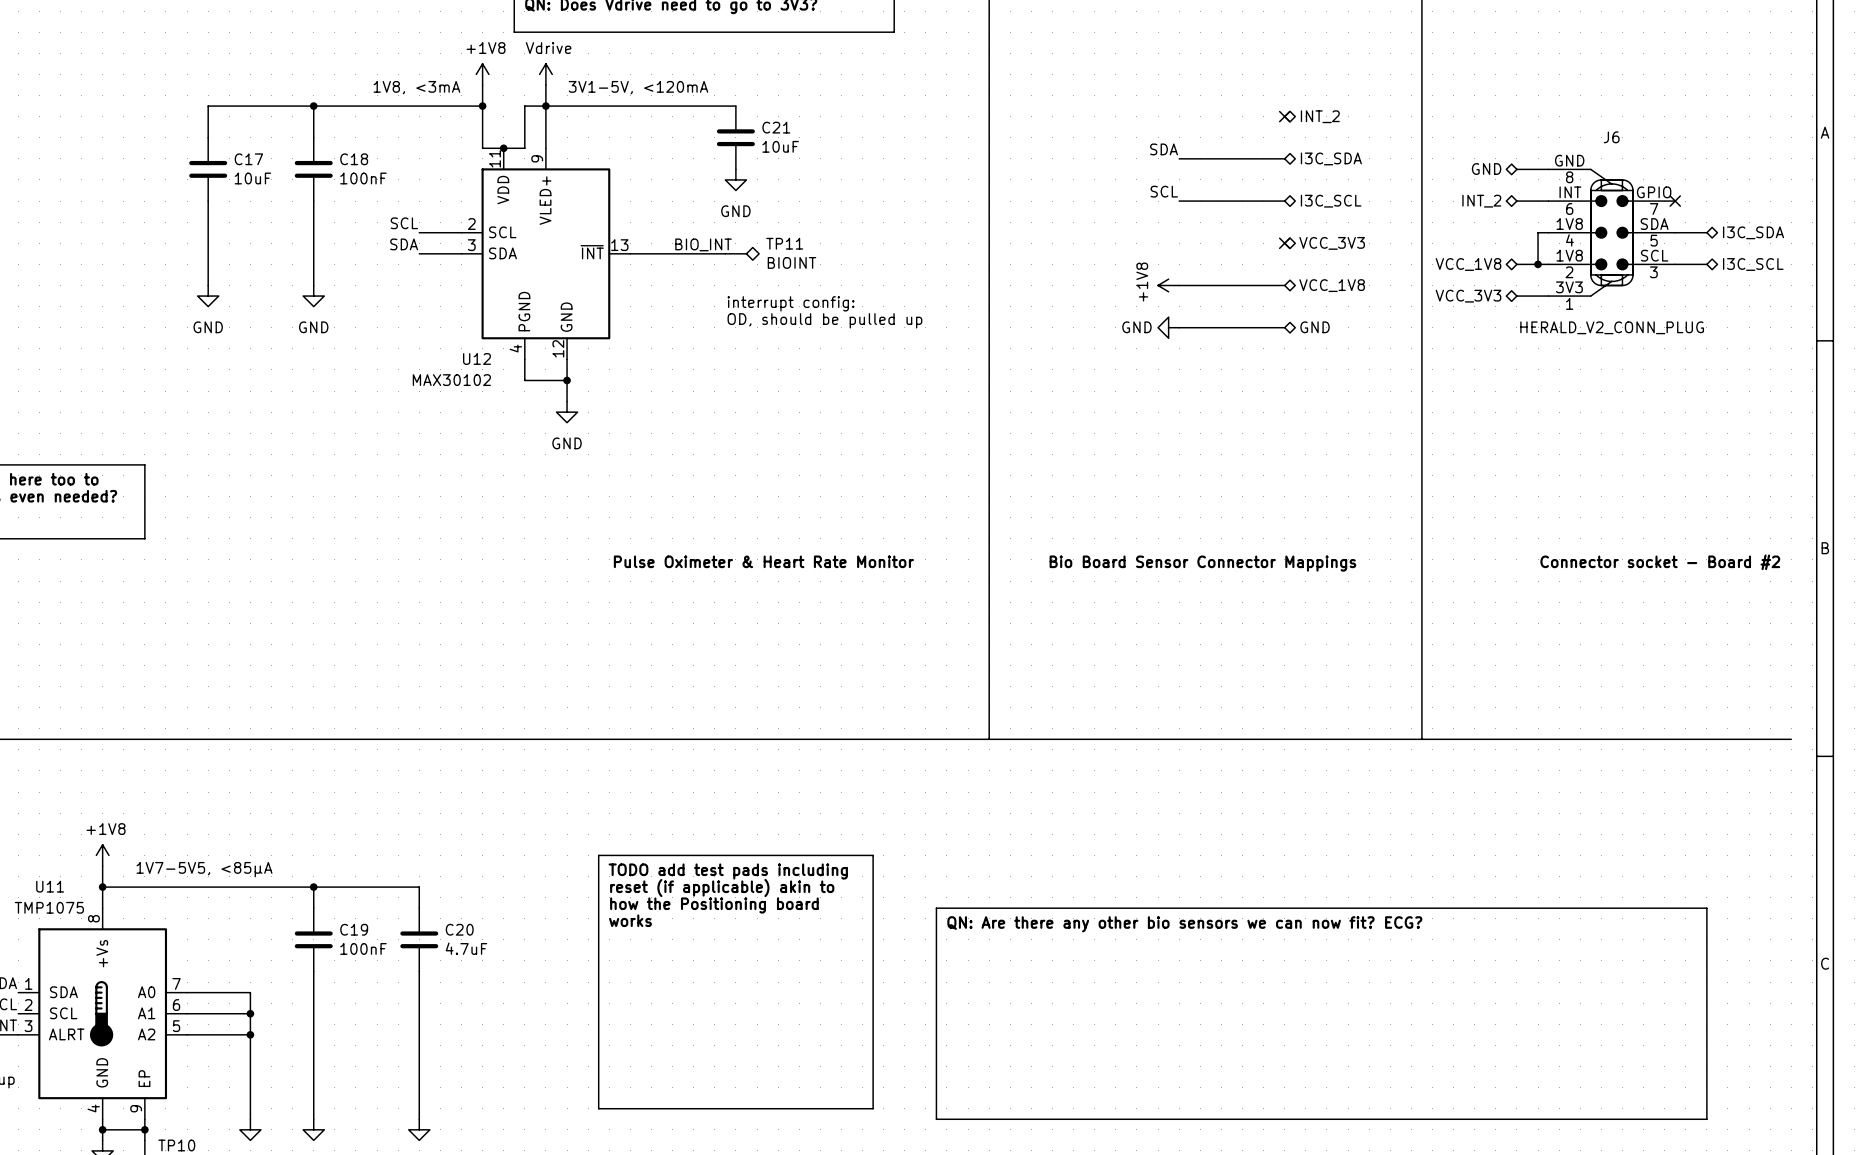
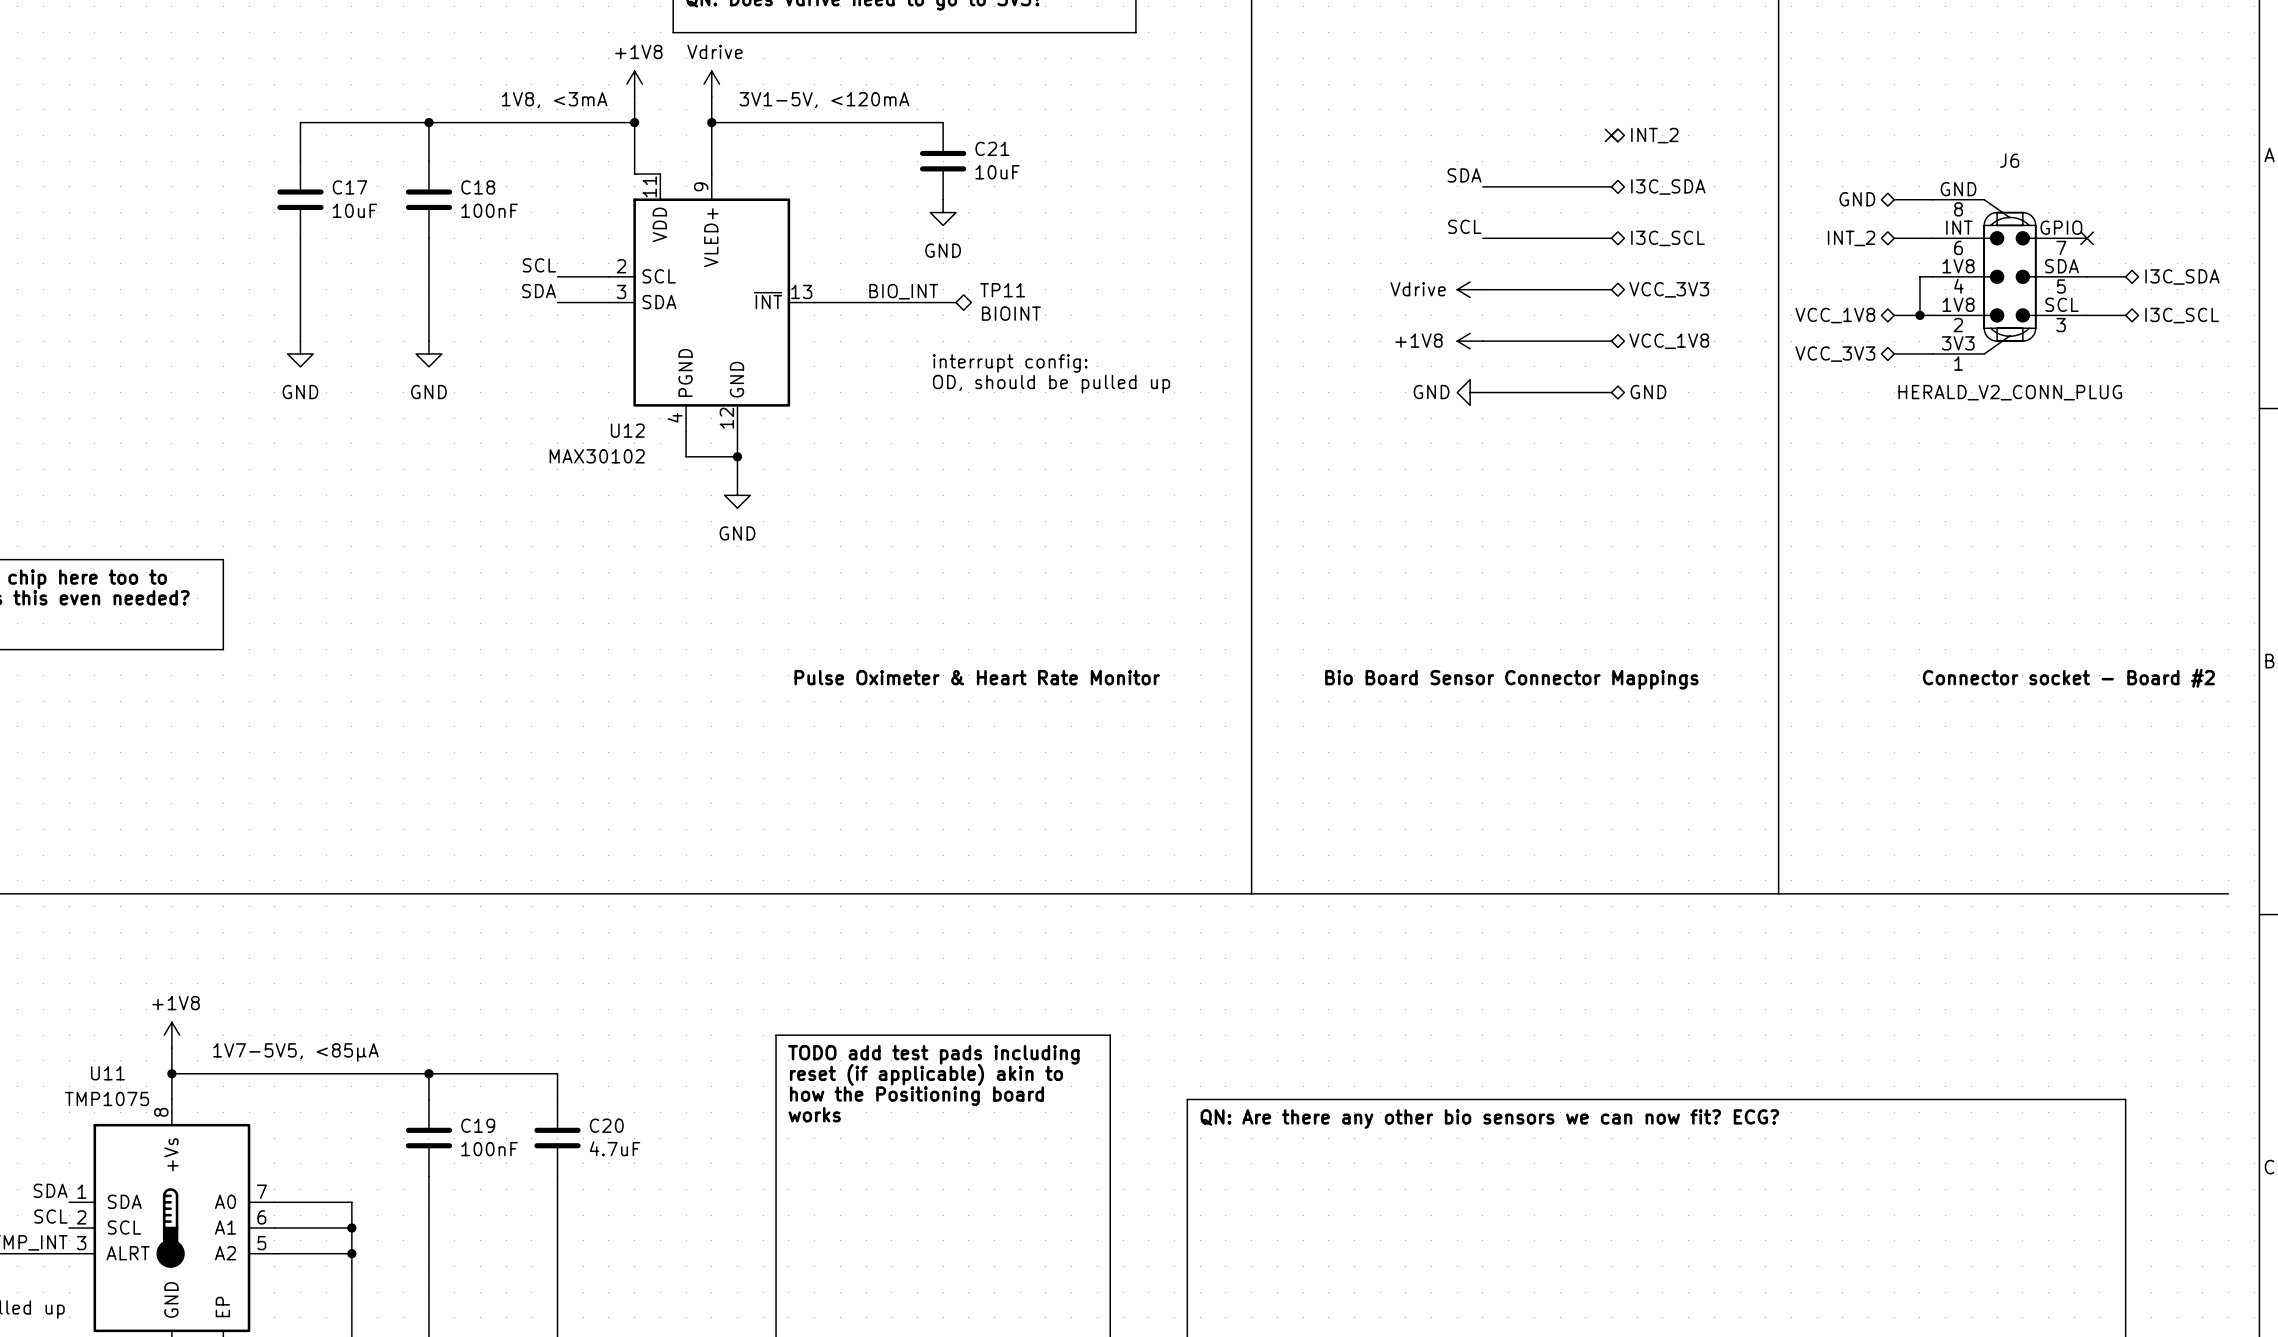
wire: (545, 106) (524, 106) (524, 148) (503, 148) -> none
junction: (503, 148) -> none
power symbol: none -> Vdrive (1470, 289)
wire: none -> (1482, 289) (1611, 289)
no-connect mark: (1284, 243) -> none
power symbol text rotation: 0° (1142, 282) -> 90° clockwise (1419, 340)

